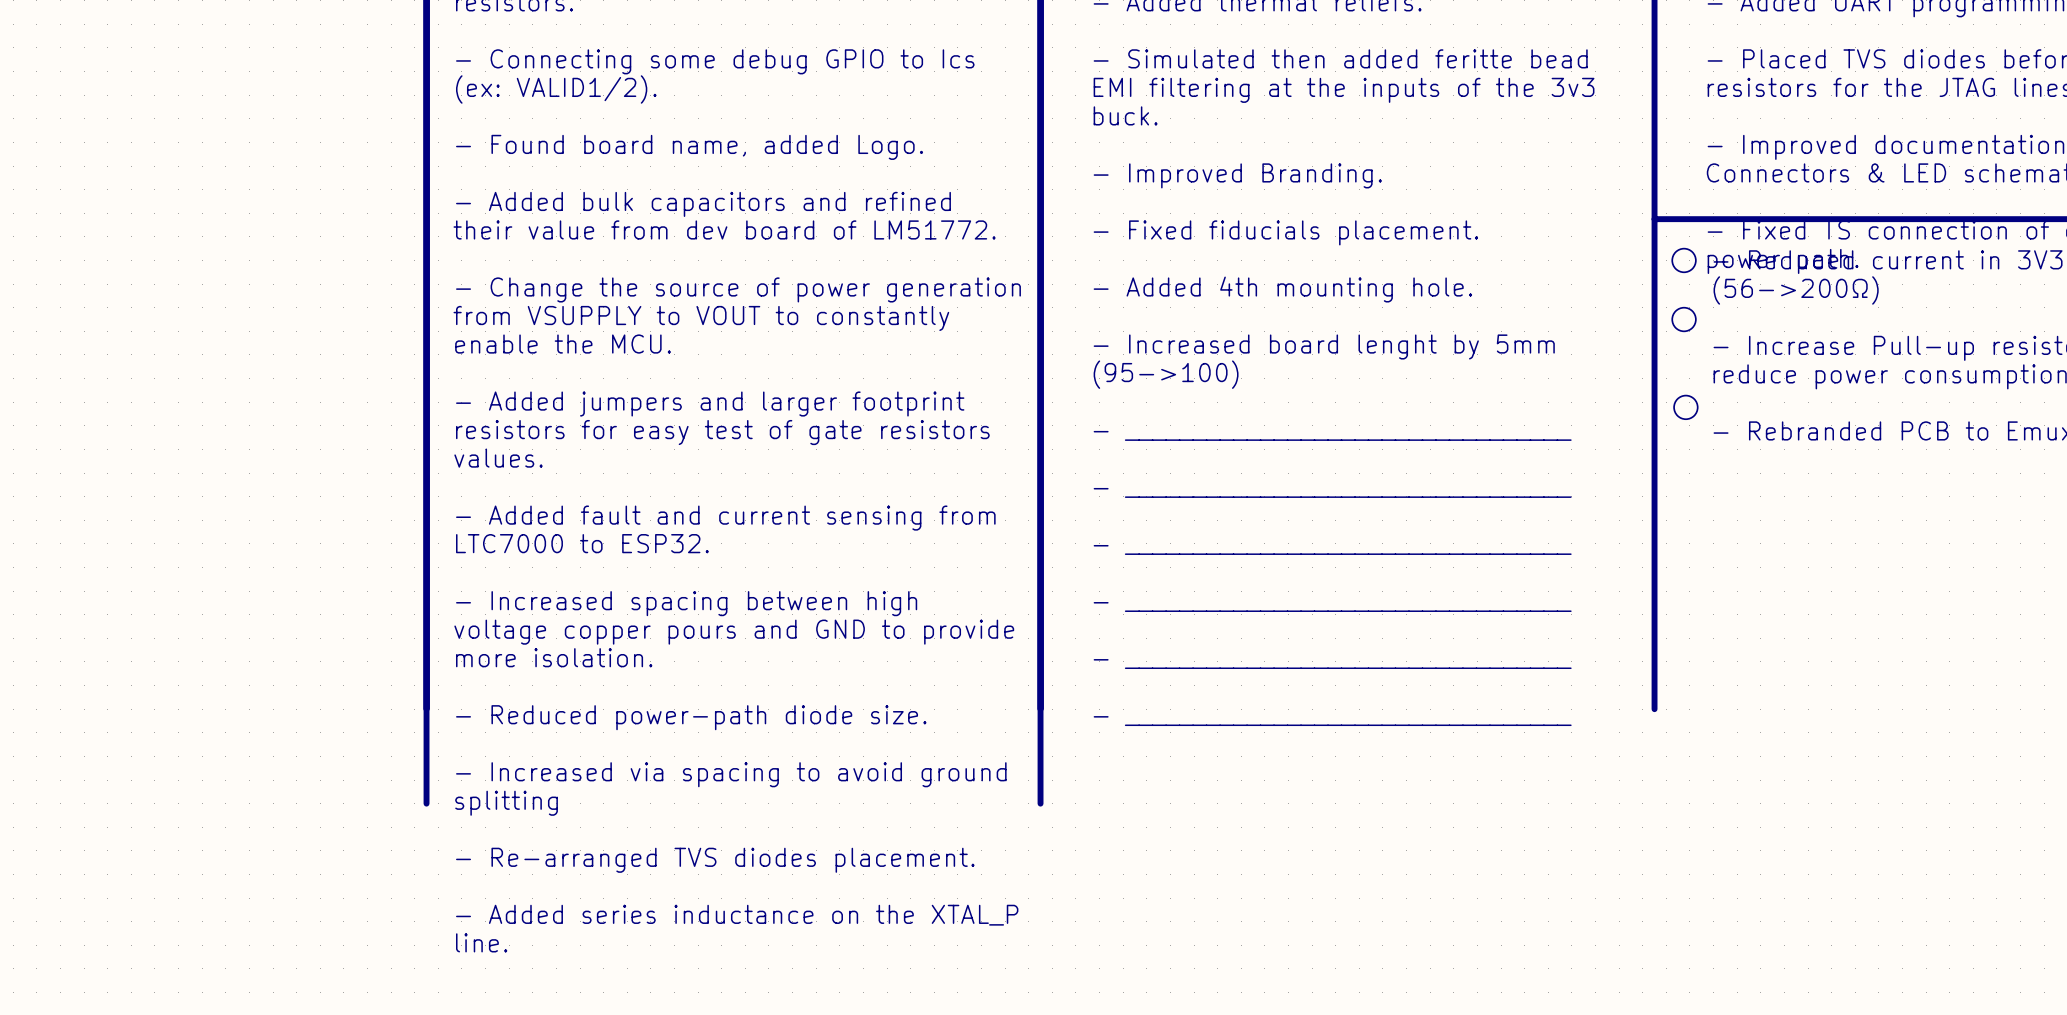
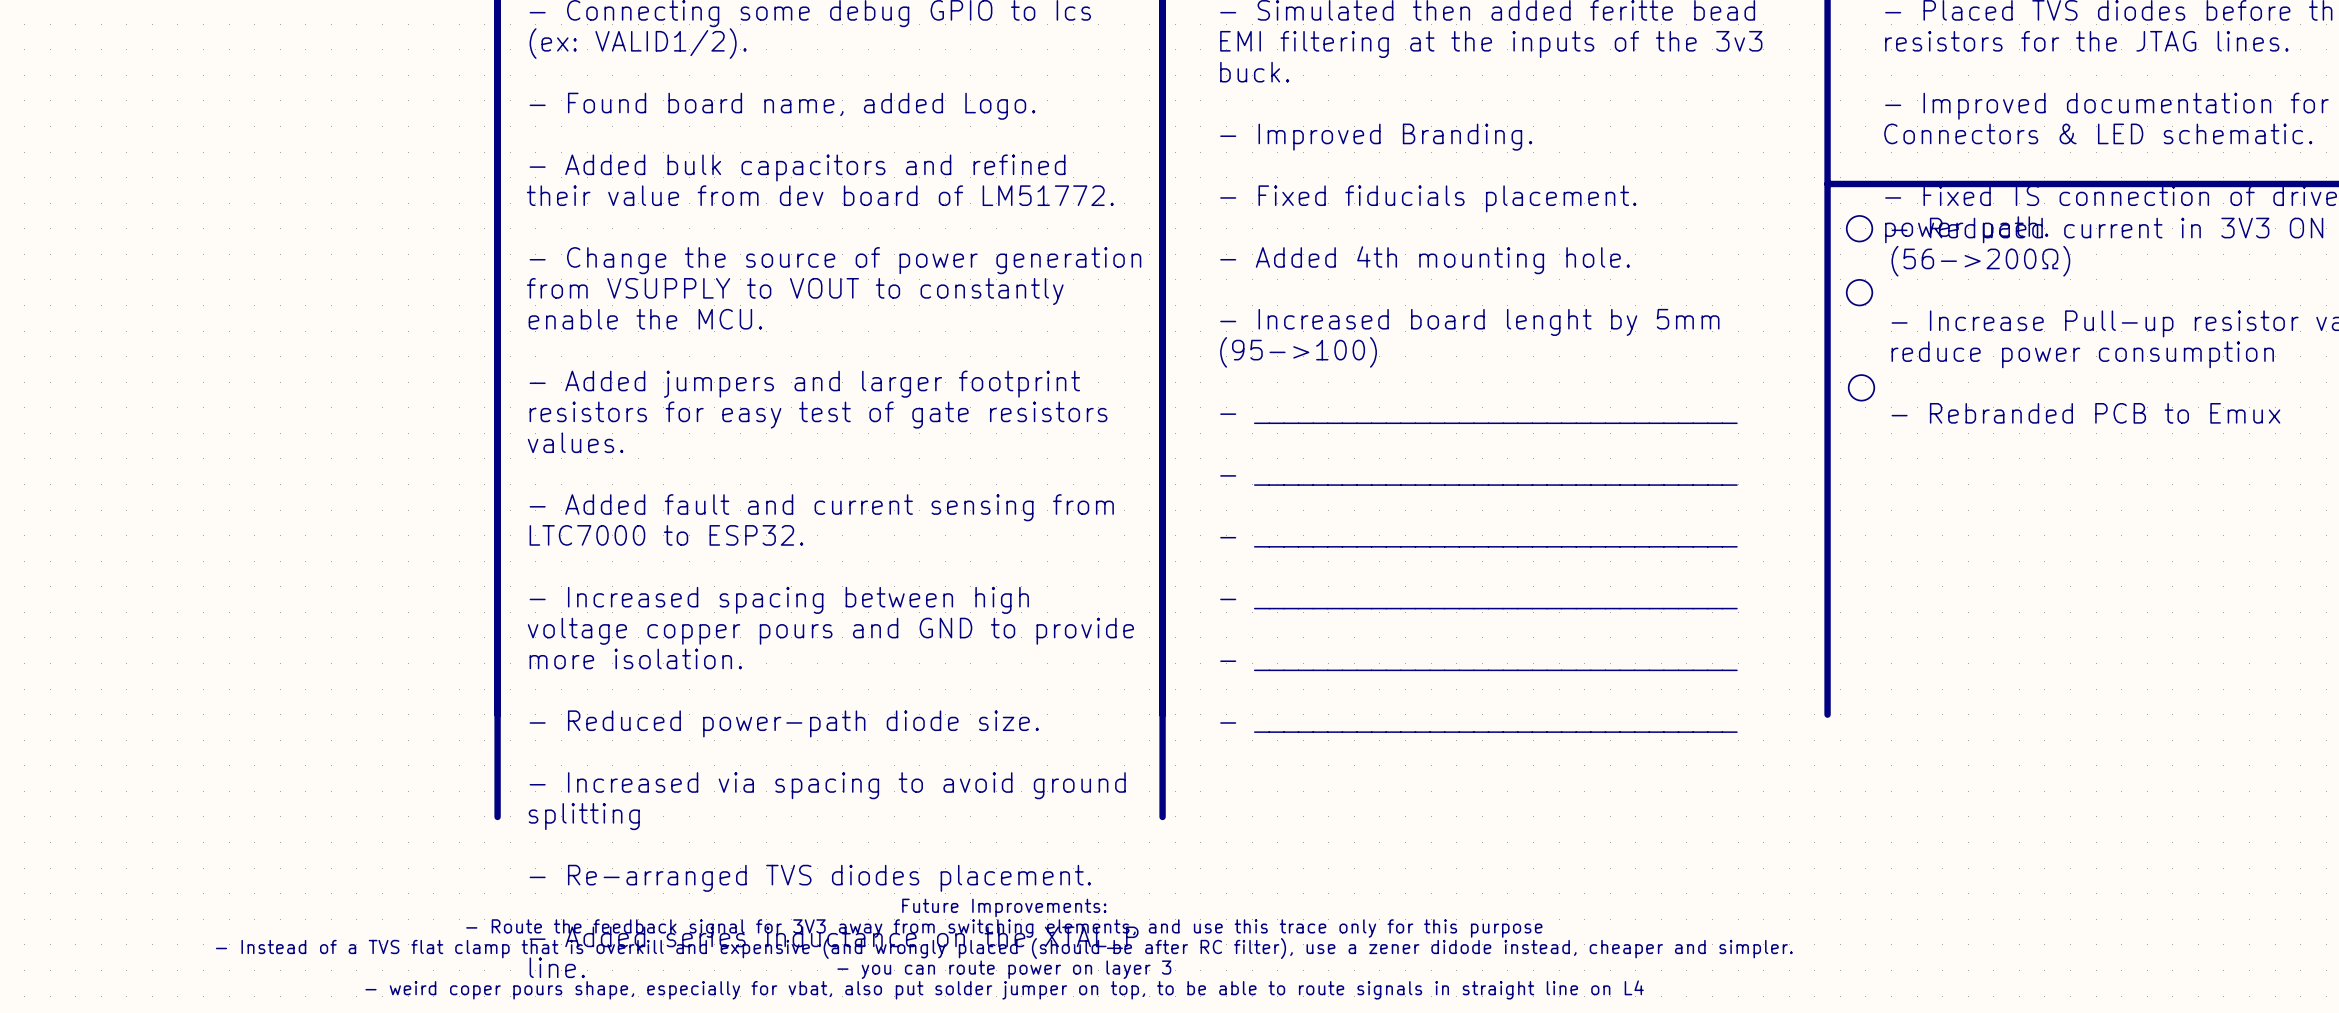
text: none -> Future Improvements: (1004, 907)
text: none -> - Route the feedback signal for 3V3 away from switching elements, and use this trace only for this purpose (1004, 928)
text: none -> - Instead of a TVS flat clamp that is overkill and expensive (and wrongly placed (should be after RC filter), use a zener didode instead, cheaper and simpler. (1004, 948)
text: none -> - you can route power on layer 3 (1004, 969)
text: none -> - weird coper pours shape, especially for vbat, also put solder jumper on top, to be able to route signals in straight line on L4 (1004, 989)

